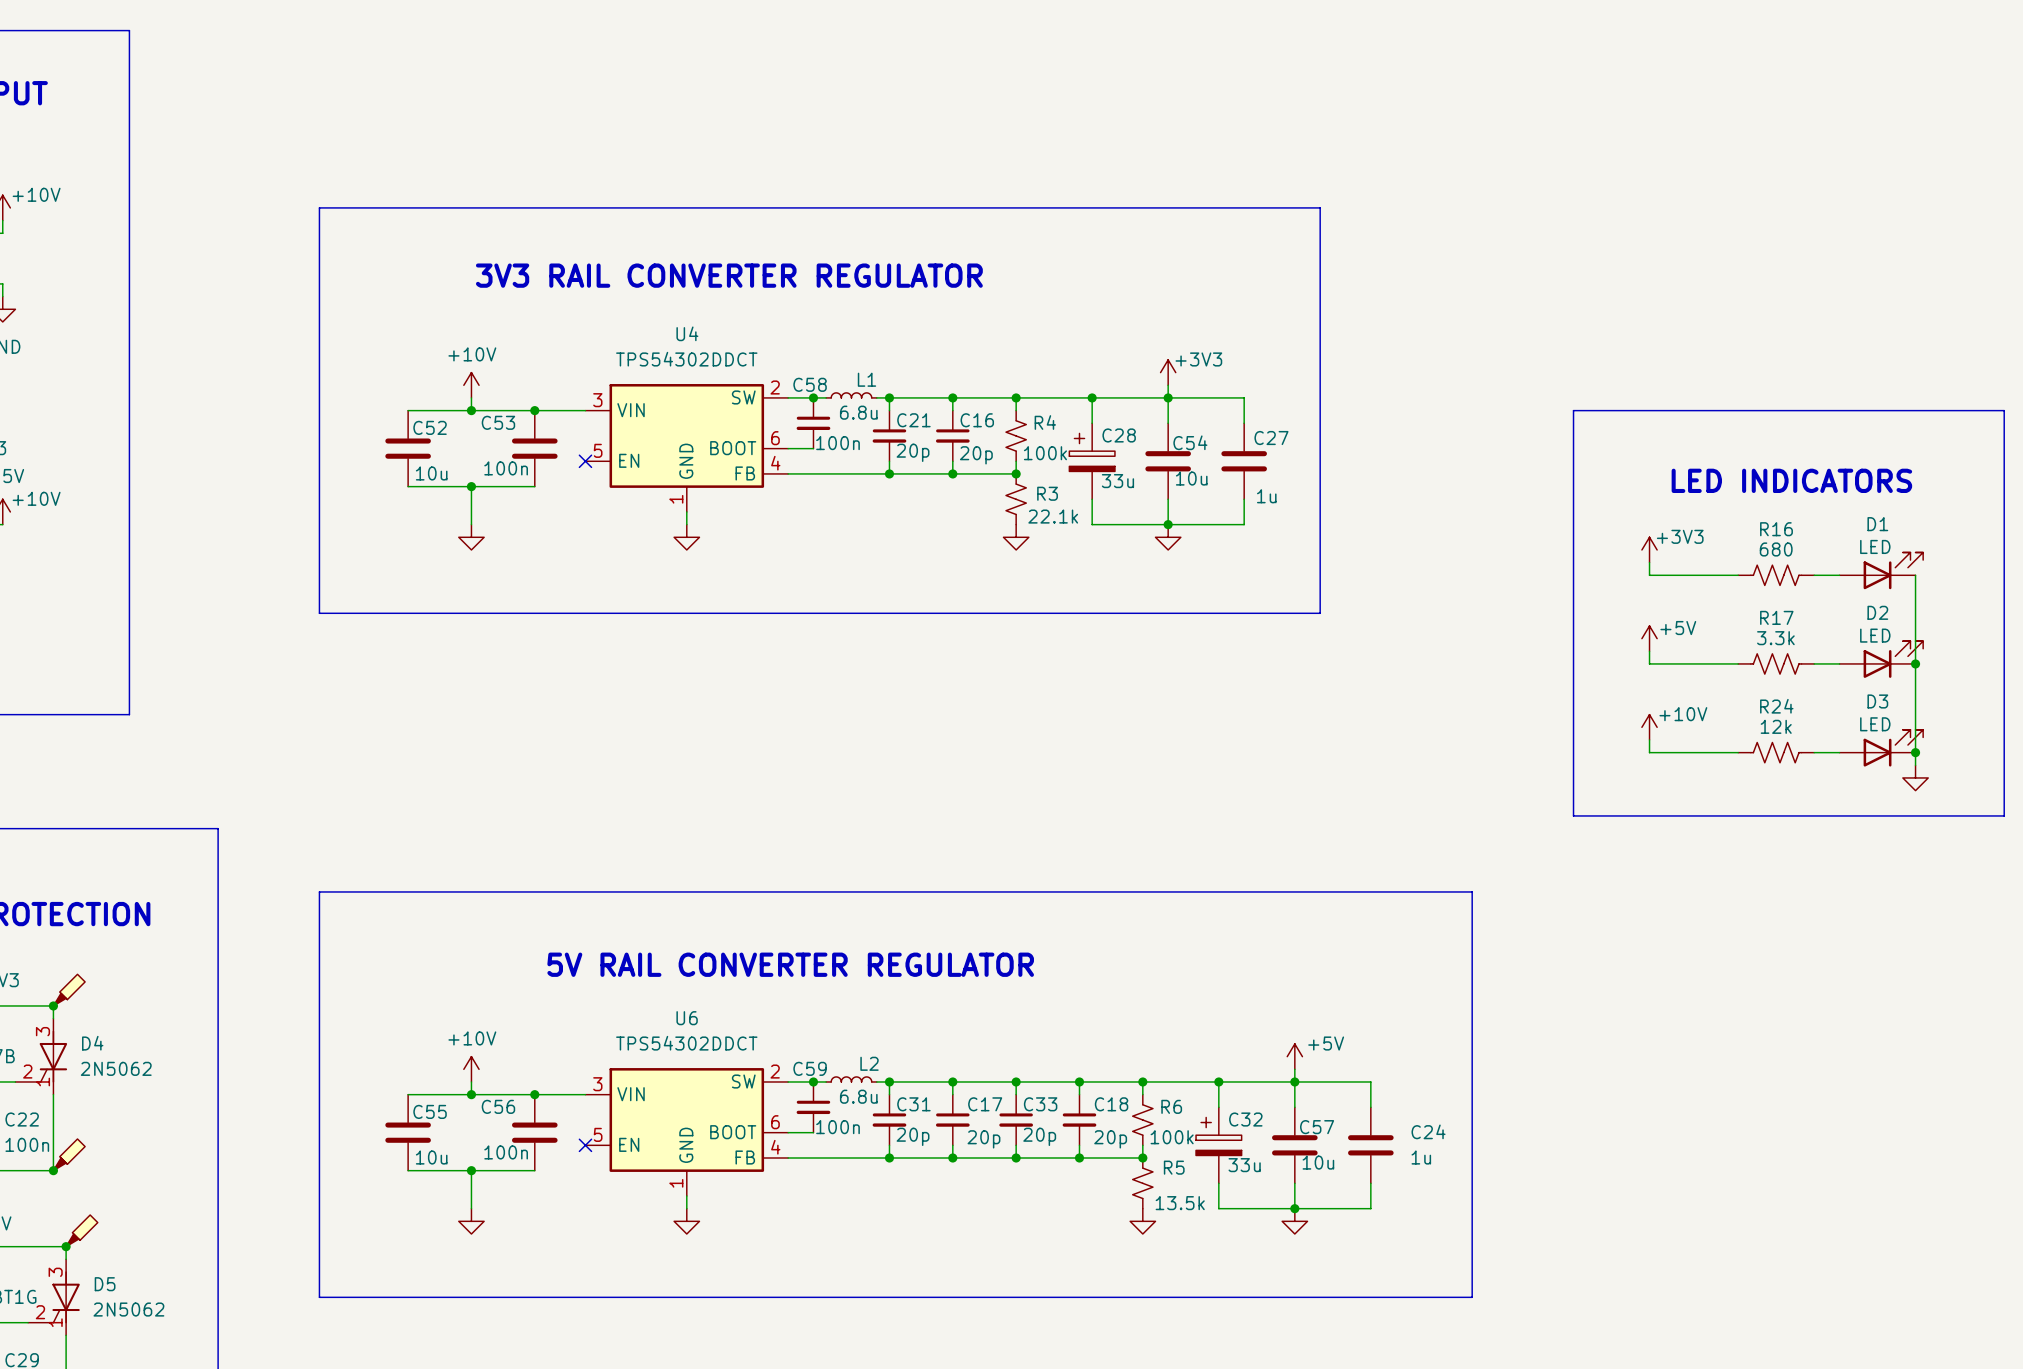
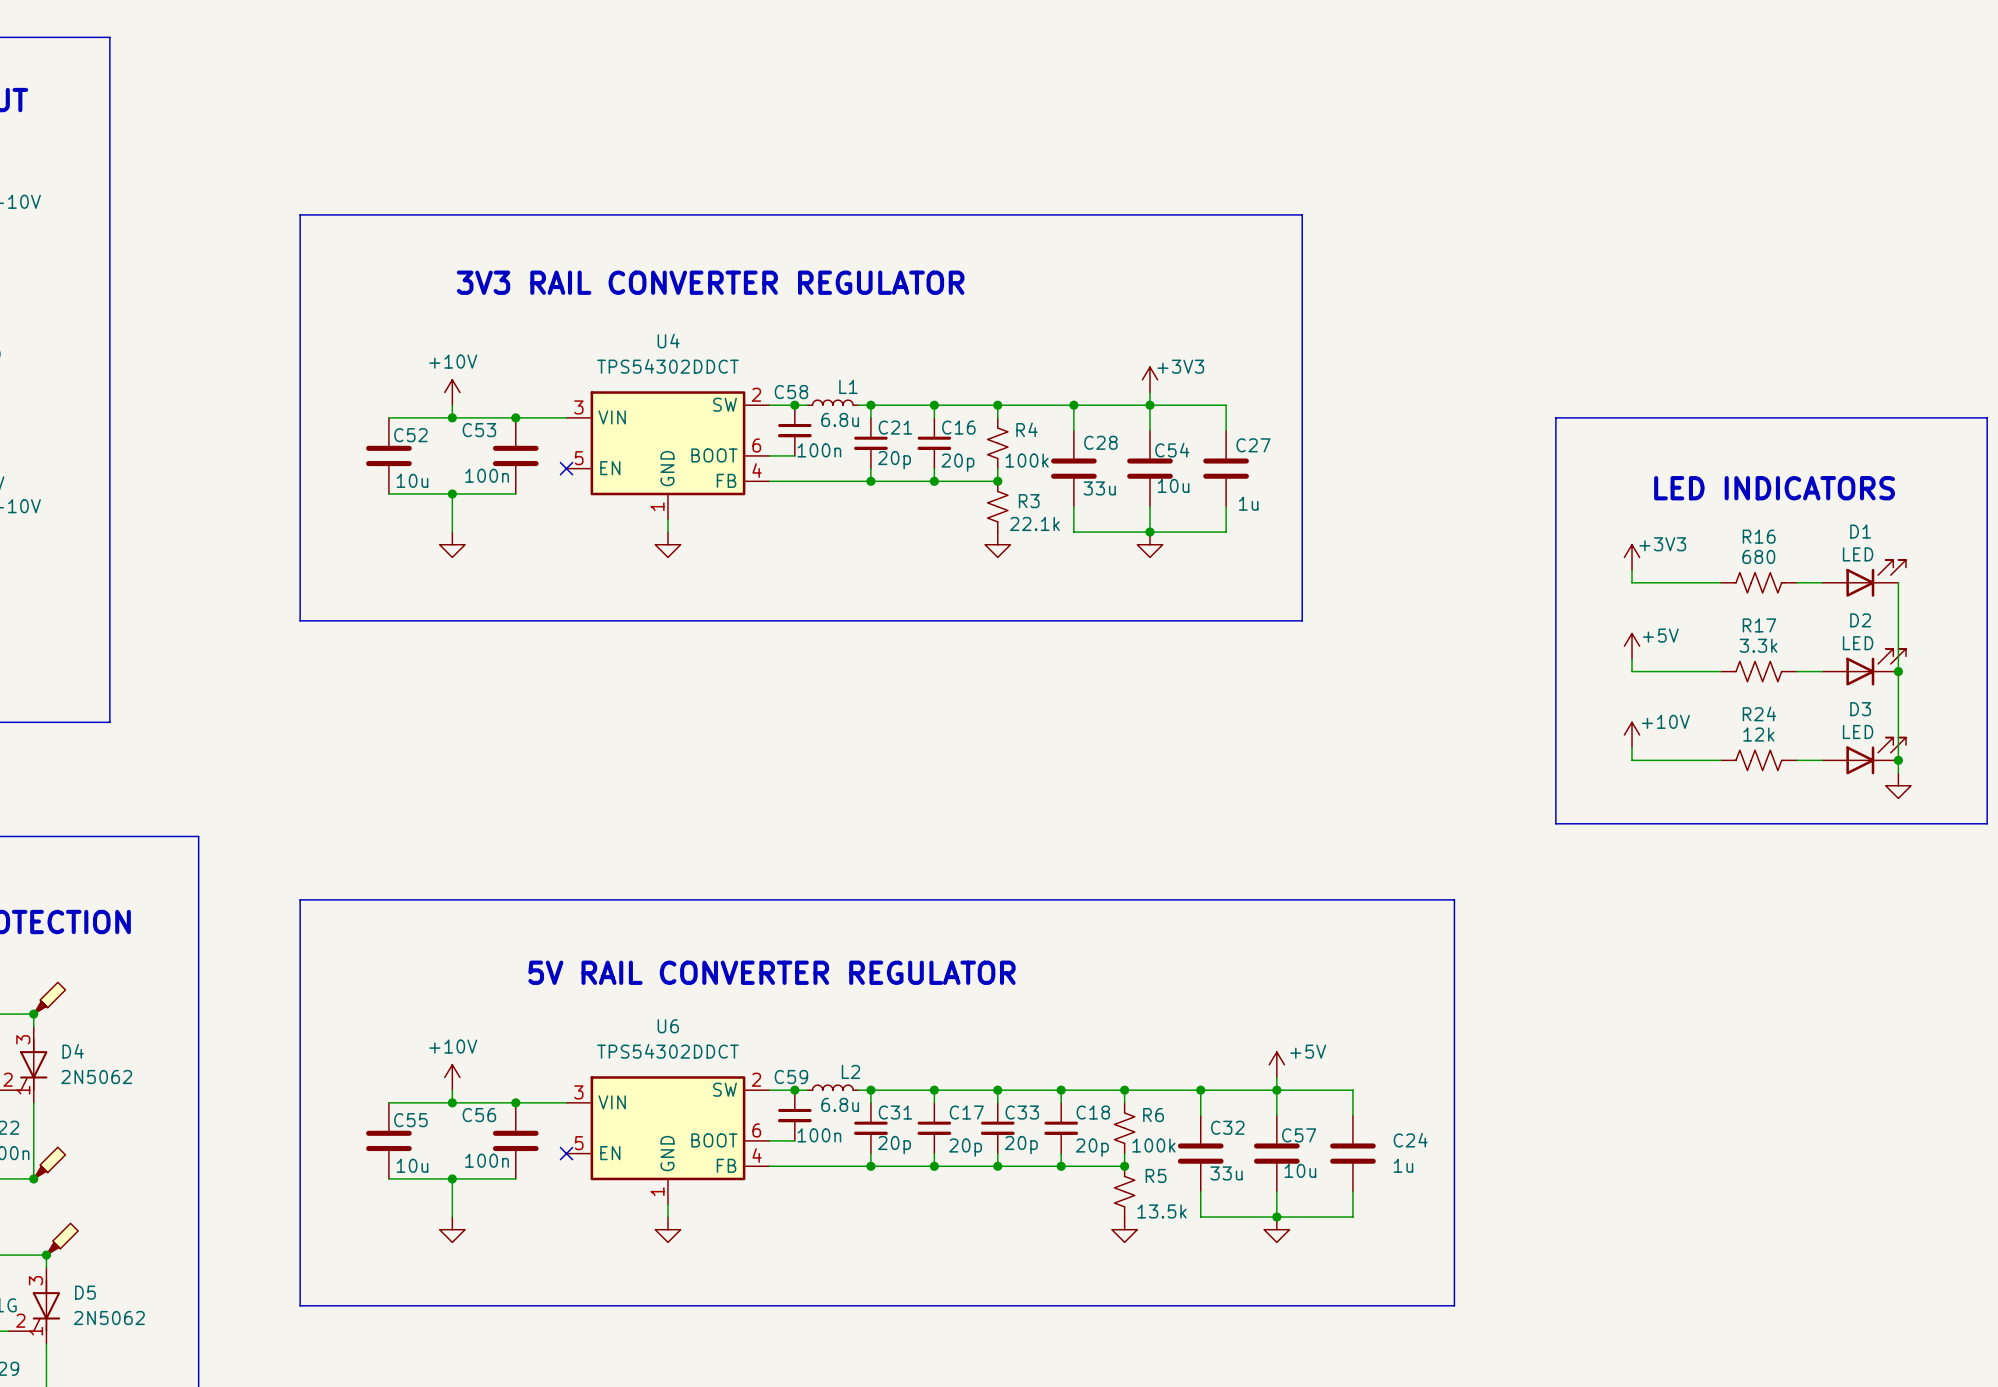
C28 symbol: [1069, 423, 1115, 500] -> [1051, 430, 1097, 507]
C32 symbol: [1196, 1107, 1242, 1184] -> [1177, 1115, 1224, 1192]

